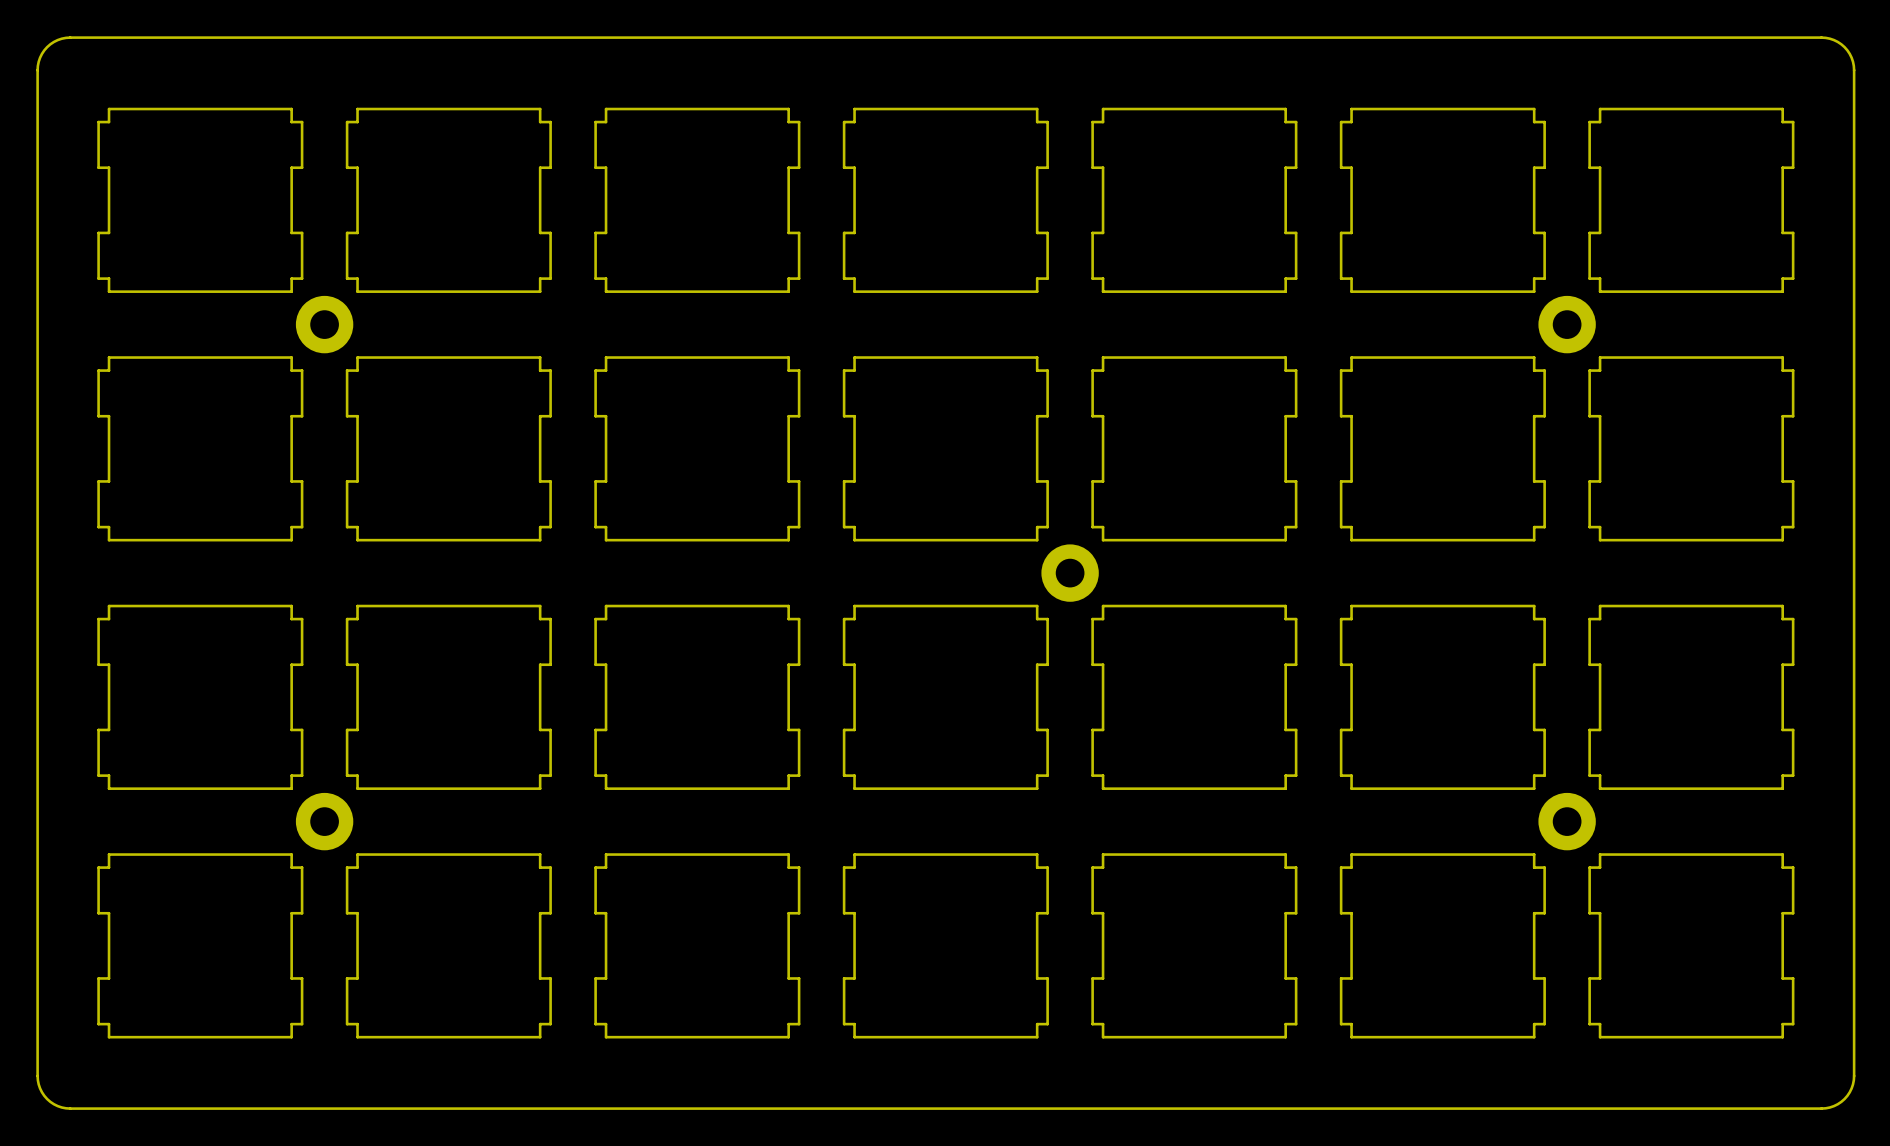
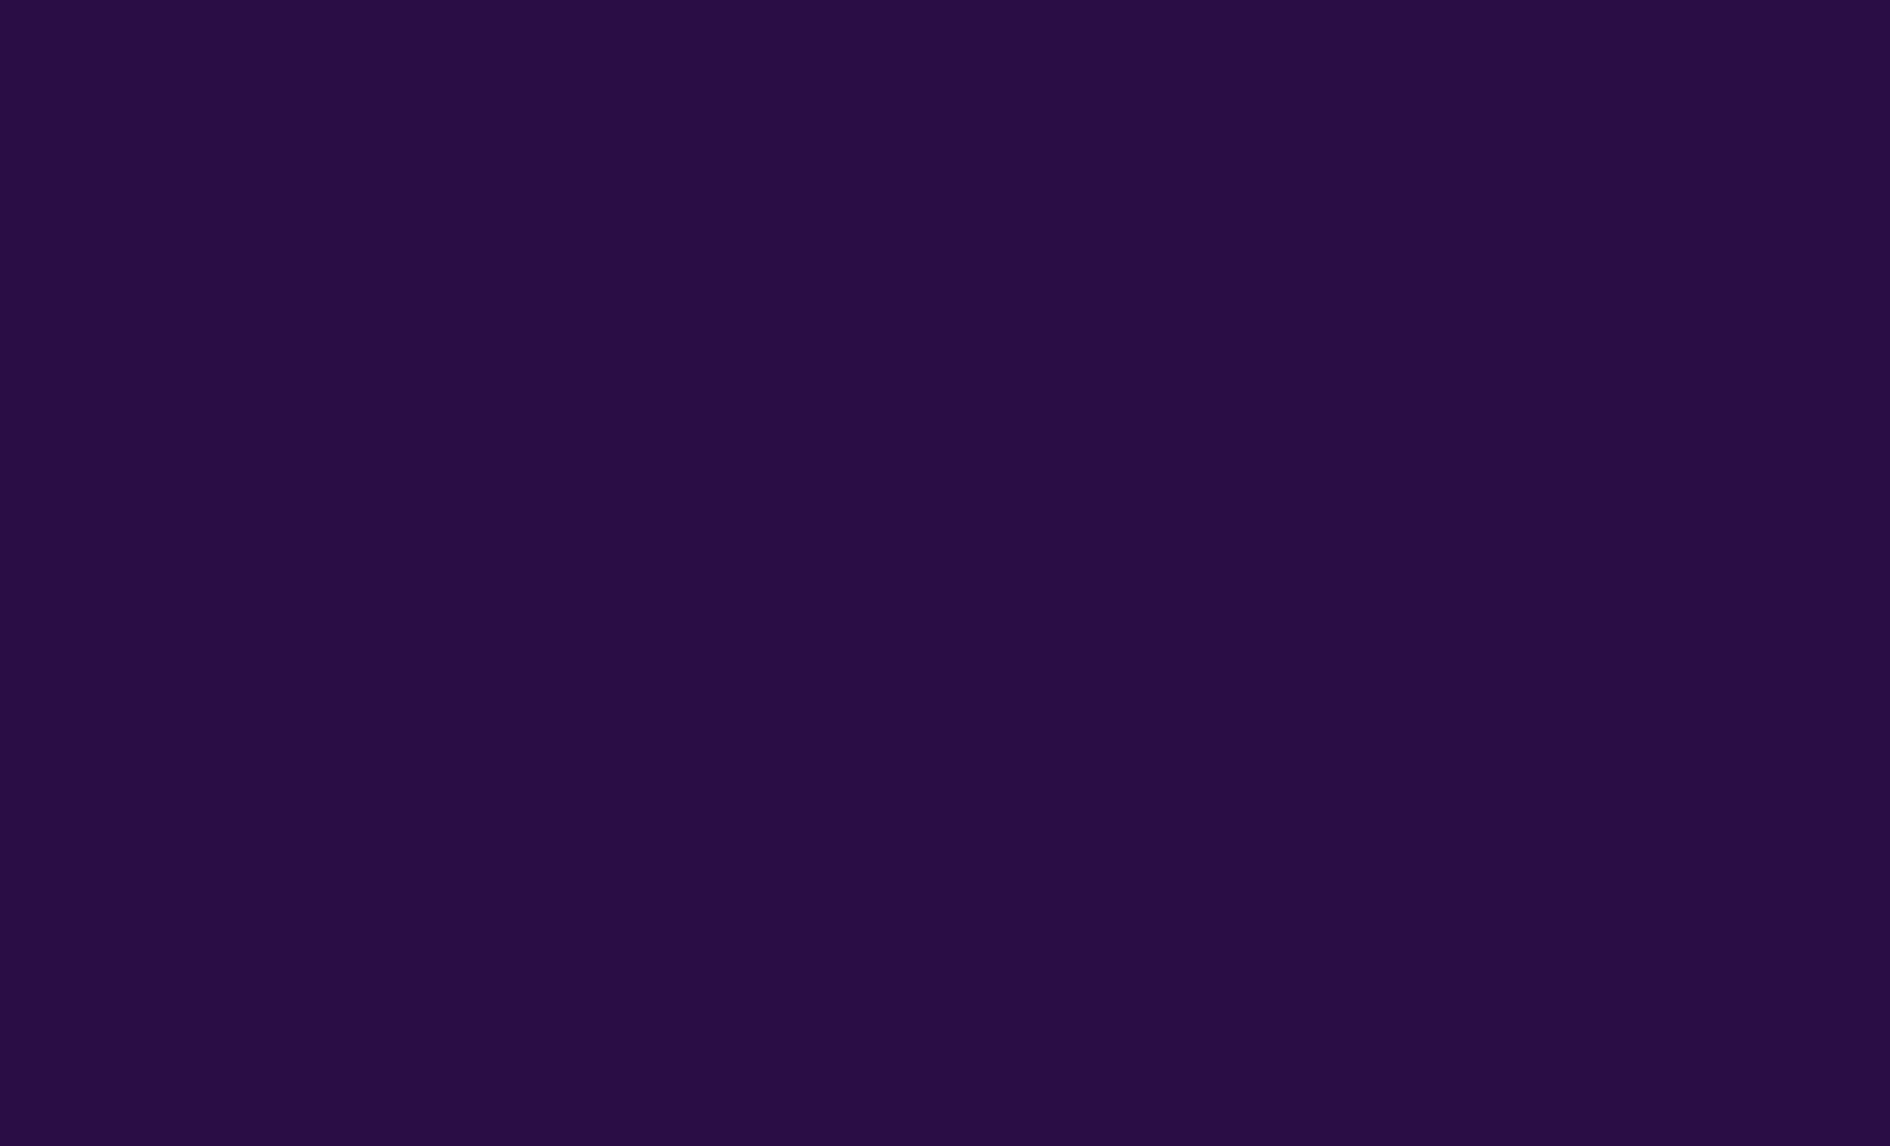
board edge: (1821, 37) (70, 37) (53, 41) (41, 53) (37, 70) (37, 1075) (41, 1092) (53, 1104) (70, 1108) (1821, 1108) (1837, 1104) (1849, 1092) (1854, 1075) (1854, 70) (1851, 57) (1844, 47) (1833, 40) (1821, 37) -> none
board edge: (291, 109) (291, 122) (302, 122) (302, 167) (291, 167) (291, 232) (302, 232) (302, 278) (291, 278) (291, 291) (109, 291) (109, 278) (98, 278) (98, 232) (109, 232) (109, 167) (98, 167) (98, 122) (109, 122) (109, 109) (291, 109) -> none
board edge: (540, 109) (357, 109) (357, 122) (347, 122) (347, 167) (357, 167) (357, 232) (347, 232) (347, 278) (357, 278) (357, 291) (540, 291) (540, 278) (550, 278) (550, 232) (540, 232) (540, 167) (550, 167) (550, 122) (540, 122) (540, 109) -> none
board edge: (788, 109) (606, 109) (606, 122) (595, 122) (595, 167) (606, 167) (606, 232) (595, 232) (595, 278) (606, 278) (606, 291) (788, 291) (788, 278) (799, 278) (799, 232) (788, 232) (788, 167) (799, 167) (799, 122) (788, 122) (788, 109) -> none
board edge: (1037, 109) (854, 109) (854, 122) (844, 122) (844, 167) (854, 167) (854, 232) (844, 232) (844, 278) (854, 278) (854, 291) (1037, 291) (1037, 278) (1047, 278) (1047, 232) (1037, 232) (1037, 167) (1047, 167) (1047, 122) (1037, 122) (1037, 109) -> none
board edge: (1285, 109) (1103, 109) (1103, 122) (1092, 122) (1092, 167) (1103, 167) (1103, 232) (1092, 232) (1092, 278) (1103, 278) (1103, 291) (1285, 291) (1285, 278) (1296, 278) (1296, 232) (1285, 232) (1285, 167) (1296, 167) (1296, 122) (1285, 122) (1285, 109) -> none
board edge: (1534, 109) (1351, 109) (1351, 122) (1341, 122) (1341, 167) (1351, 167) (1351, 232) (1341, 232) (1341, 278) (1351, 278) (1351, 291) (1534, 291) (1534, 278) (1544, 278) (1544, 232) (1534, 232) (1534, 167) (1544, 167) (1544, 122) (1534, 122) (1534, 109) -> none
board edge: (1782, 109) (1600, 109) (1600, 122) (1589, 122) (1589, 167) (1600, 167) (1600, 232) (1589, 232) (1589, 278) (1600, 278) (1600, 291) (1782, 291) (1782, 278) (1793, 278) (1793, 232) (1782, 232) (1782, 167) (1793, 167) (1793, 122) (1782, 122) (1782, 109) -> none
part: (324, 324) -> none
part: (1567, 324) -> none
board edge: (291, 357) (291, 370) (302, 370) (302, 416) (291, 416) (291, 481) (302, 481) (302, 527) (291, 527) (291, 540) (109, 540) (109, 527) (98, 527) (98, 481) (109, 481) (109, 416) (98, 416) (98, 370) (109, 370) (109, 357) (291, 357) -> none
board edge: (540, 357) (357, 357) (357, 370) (347, 370) (347, 416) (357, 416) (357, 481) (347, 481) (347, 527) (357, 527) (357, 540) (540, 540) (540, 527) (550, 527) (550, 481) (540, 481) (540, 416) (550, 416) (550, 370) (540, 370) (540, 357) -> none
board edge: (788, 357) (606, 357) (606, 370) (595, 370) (595, 416) (606, 416) (606, 481) (595, 481) (595, 527) (606, 527) (606, 540) (788, 540) (788, 527) (799, 527) (799, 481) (788, 481) (788, 416) (799, 416) (799, 370) (788, 370) (788, 357) -> none
board edge: (1037, 357) (854, 357) (854, 370) (844, 370) (844, 416) (854, 416) (854, 481) (844, 481) (844, 527) (854, 527) (854, 540) (1037, 540) (1037, 527) (1047, 527) (1047, 481) (1037, 481) (1037, 416) (1047, 416) (1047, 370) (1037, 370) (1037, 357) -> none
board edge: (1285, 357) (1103, 357) (1103, 370) (1092, 370) (1092, 416) (1103, 416) (1103, 481) (1092, 481) (1092, 527) (1103, 527) (1103, 540) (1285, 540) (1285, 527) (1296, 527) (1296, 481) (1285, 481) (1285, 416) (1296, 416) (1296, 370) (1285, 370) (1285, 357) -> none
board edge: (1534, 357) (1351, 357) (1351, 370) (1341, 370) (1341, 416) (1351, 416) (1351, 481) (1341, 481) (1341, 527) (1351, 527) (1351, 540) (1534, 540) (1534, 527) (1544, 527) (1544, 481) (1534, 481) (1534, 416) (1544, 416) (1544, 370) (1534, 370) (1534, 357) -> none
board edge: (1782, 357) (1600, 357) (1600, 370) (1589, 370) (1589, 416) (1600, 416) (1600, 481) (1589, 481) (1589, 527) (1600, 527) (1600, 540) (1782, 540) (1782, 527) (1793, 527) (1793, 481) (1782, 481) (1782, 416) (1793, 416) (1793, 370) (1782, 370) (1782, 357) -> none
part: (1070, 573) -> none
board edge: (291, 606) (291, 619) (302, 619) (302, 664) (291, 664) (291, 729) (302, 729) (302, 775) (291, 775) (291, 788) (109, 788) (109, 775) (98, 775) (98, 729) (109, 729) (109, 664) (98, 664) (98, 619) (109, 619) (109, 606) (291, 606) -> none
board edge: (540, 606) (357, 606) (357, 619) (347, 619) (347, 664) (357, 664) (357, 729) (347, 729) (347, 775) (357, 775) (357, 788) (540, 788) (540, 775) (550, 775) (550, 729) (540, 729) (540, 664) (550, 664) (550, 619) (540, 619) (540, 606) -> none
board edge: (788, 606) (606, 606) (606, 619) (595, 619) (595, 664) (606, 664) (606, 729) (595, 729) (595, 775) (606, 775) (606, 788) (788, 788) (788, 775) (799, 775) (799, 729) (788, 729) (788, 664) (799, 664) (799, 619) (788, 619) (788, 606) -> none
board edge: (1037, 606) (854, 606) (854, 619) (844, 619) (844, 664) (854, 664) (854, 729) (844, 729) (844, 775) (854, 775) (854, 788) (1037, 788) (1037, 775) (1047, 775) (1047, 729) (1037, 729) (1037, 664) (1047, 664) (1047, 619) (1037, 619) (1037, 606) -> none
board edge: (1285, 606) (1103, 606) (1103, 619) (1092, 619) (1092, 664) (1103, 664) (1103, 729) (1092, 729) (1092, 775) (1103, 775) (1103, 788) (1285, 788) (1285, 775) (1296, 775) (1296, 729) (1285, 729) (1285, 664) (1296, 664) (1296, 619) (1285, 619) (1285, 606) -> none
board edge: (1534, 606) (1351, 606) (1351, 619) (1341, 619) (1341, 664) (1351, 664) (1351, 729) (1341, 729) (1341, 775) (1351, 775) (1351, 788) (1534, 788) (1534, 775) (1544, 775) (1544, 729) (1534, 729) (1534, 664) (1544, 664) (1544, 619) (1534, 619) (1534, 606) -> none
board edge: (1782, 606) (1600, 606) (1600, 619) (1589, 619) (1589, 664) (1600, 664) (1600, 729) (1589, 729) (1589, 775) (1600, 775) (1600, 788) (1782, 788) (1782, 775) (1793, 775) (1793, 729) (1782, 729) (1782, 664) (1793, 664) (1793, 619) (1782, 619) (1782, 606) -> none
part: (324, 821) -> none
part: (1567, 821) -> none
board edge: (291, 854) (291, 867) (302, 867) (302, 913) (291, 913) (291, 978) (302, 978) (302, 1024) (291, 1024) (291, 1037) (109, 1037) (109, 1024) (98, 1024) (98, 978) (109, 978) (109, 913) (98, 913) (98, 867) (109, 867) (109, 854) (291, 854) -> none
board edge: (540, 854) (357, 854) (357, 867) (347, 867) (347, 913) (357, 913) (357, 978) (347, 978) (347, 1024) (357, 1024) (357, 1037) (540, 1037) (540, 1024) (550, 1024) (550, 978) (540, 978) (540, 913) (550, 913) (550, 867) (540, 867) (540, 854) -> none
board edge: (788, 854) (606, 854) (606, 867) (595, 867) (595, 913) (606, 913) (606, 978) (595, 978) (595, 1024) (606, 1024) (606, 1037) (788, 1037) (788, 1024) (799, 1024) (799, 978) (788, 978) (788, 913) (799, 913) (799, 867) (788, 867) (788, 854) -> none
board edge: (1037, 854) (854, 854) (854, 867) (844, 867) (844, 913) (854, 913) (854, 978) (844, 978) (844, 1024) (854, 1024) (854, 1037) (1037, 1037) (1037, 1024) (1047, 1024) (1047, 978) (1037, 978) (1037, 913) (1047, 913) (1047, 867) (1037, 867) (1037, 854) -> none
board edge: (1285, 854) (1103, 854) (1103, 867) (1092, 867) (1092, 913) (1103, 913) (1103, 978) (1092, 978) (1092, 1024) (1103, 1024) (1103, 1037) (1285, 1037) (1285, 1024) (1296, 1024) (1296, 978) (1285, 978) (1285, 913) (1296, 913) (1296, 867) (1285, 867) (1285, 854) -> none
board edge: (1534, 854) (1351, 854) (1351, 867) (1341, 867) (1341, 913) (1351, 913) (1351, 978) (1341, 978) (1341, 1024) (1351, 1024) (1351, 1037) (1534, 1037) (1534, 1024) (1544, 1024) (1544, 978) (1534, 978) (1534, 913) (1544, 913) (1544, 867) (1534, 867) (1534, 854) -> none
board edge: (1782, 854) (1600, 854) (1600, 867) (1589, 867) (1589, 913) (1600, 913) (1600, 978) (1589, 978) (1589, 1024) (1600, 1024) (1600, 1037) (1782, 1037) (1782, 1024) (1793, 1024) (1793, 978) (1782, 978) (1782, 913) (1793, 913) (1793, 867) (1782, 867) (1782, 854) -> none

